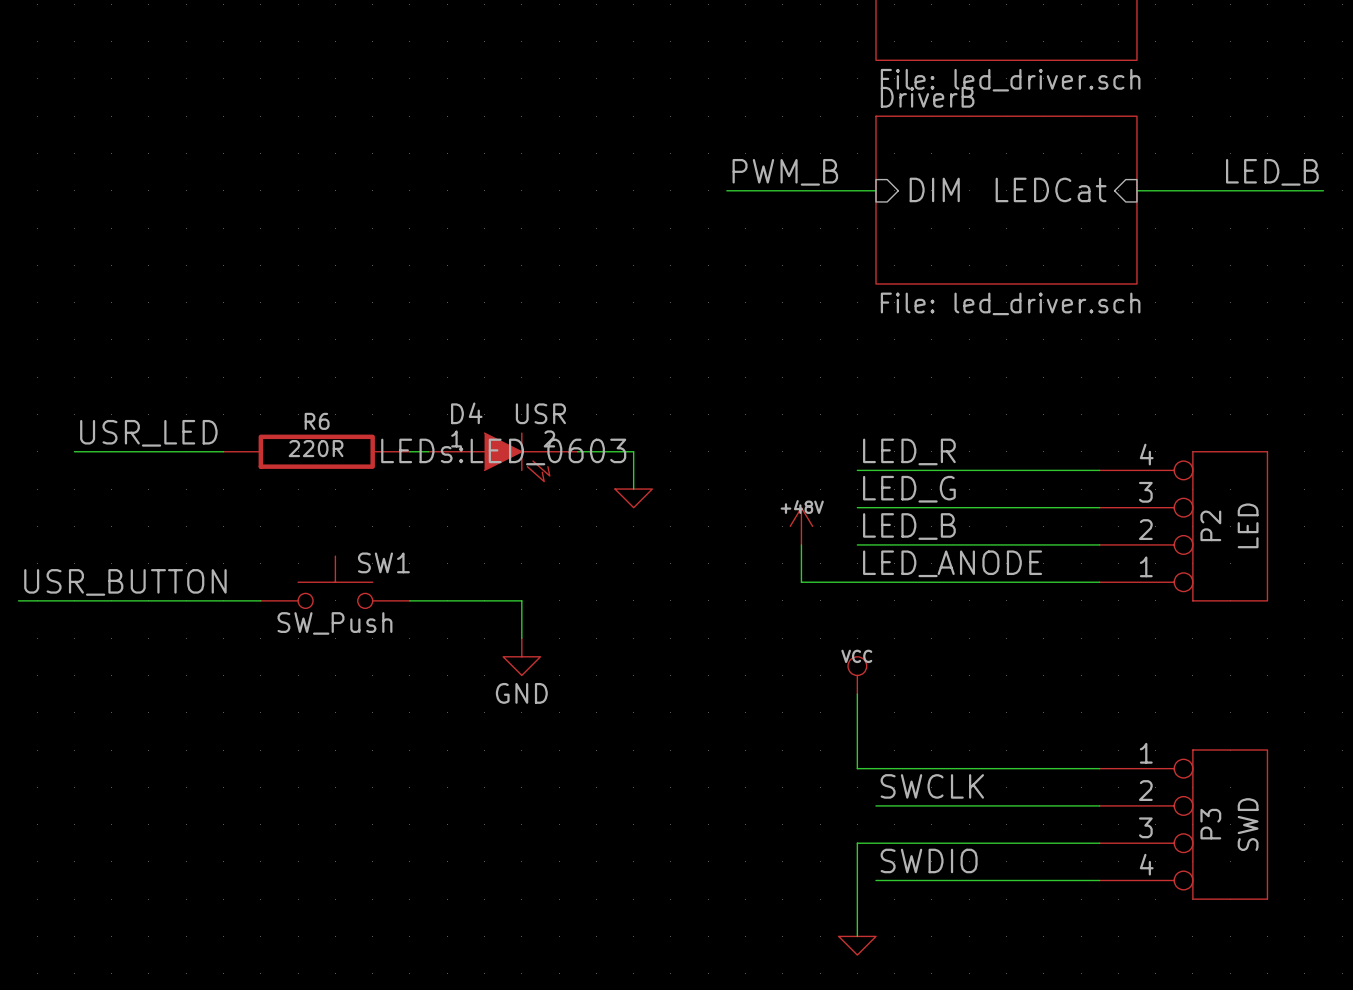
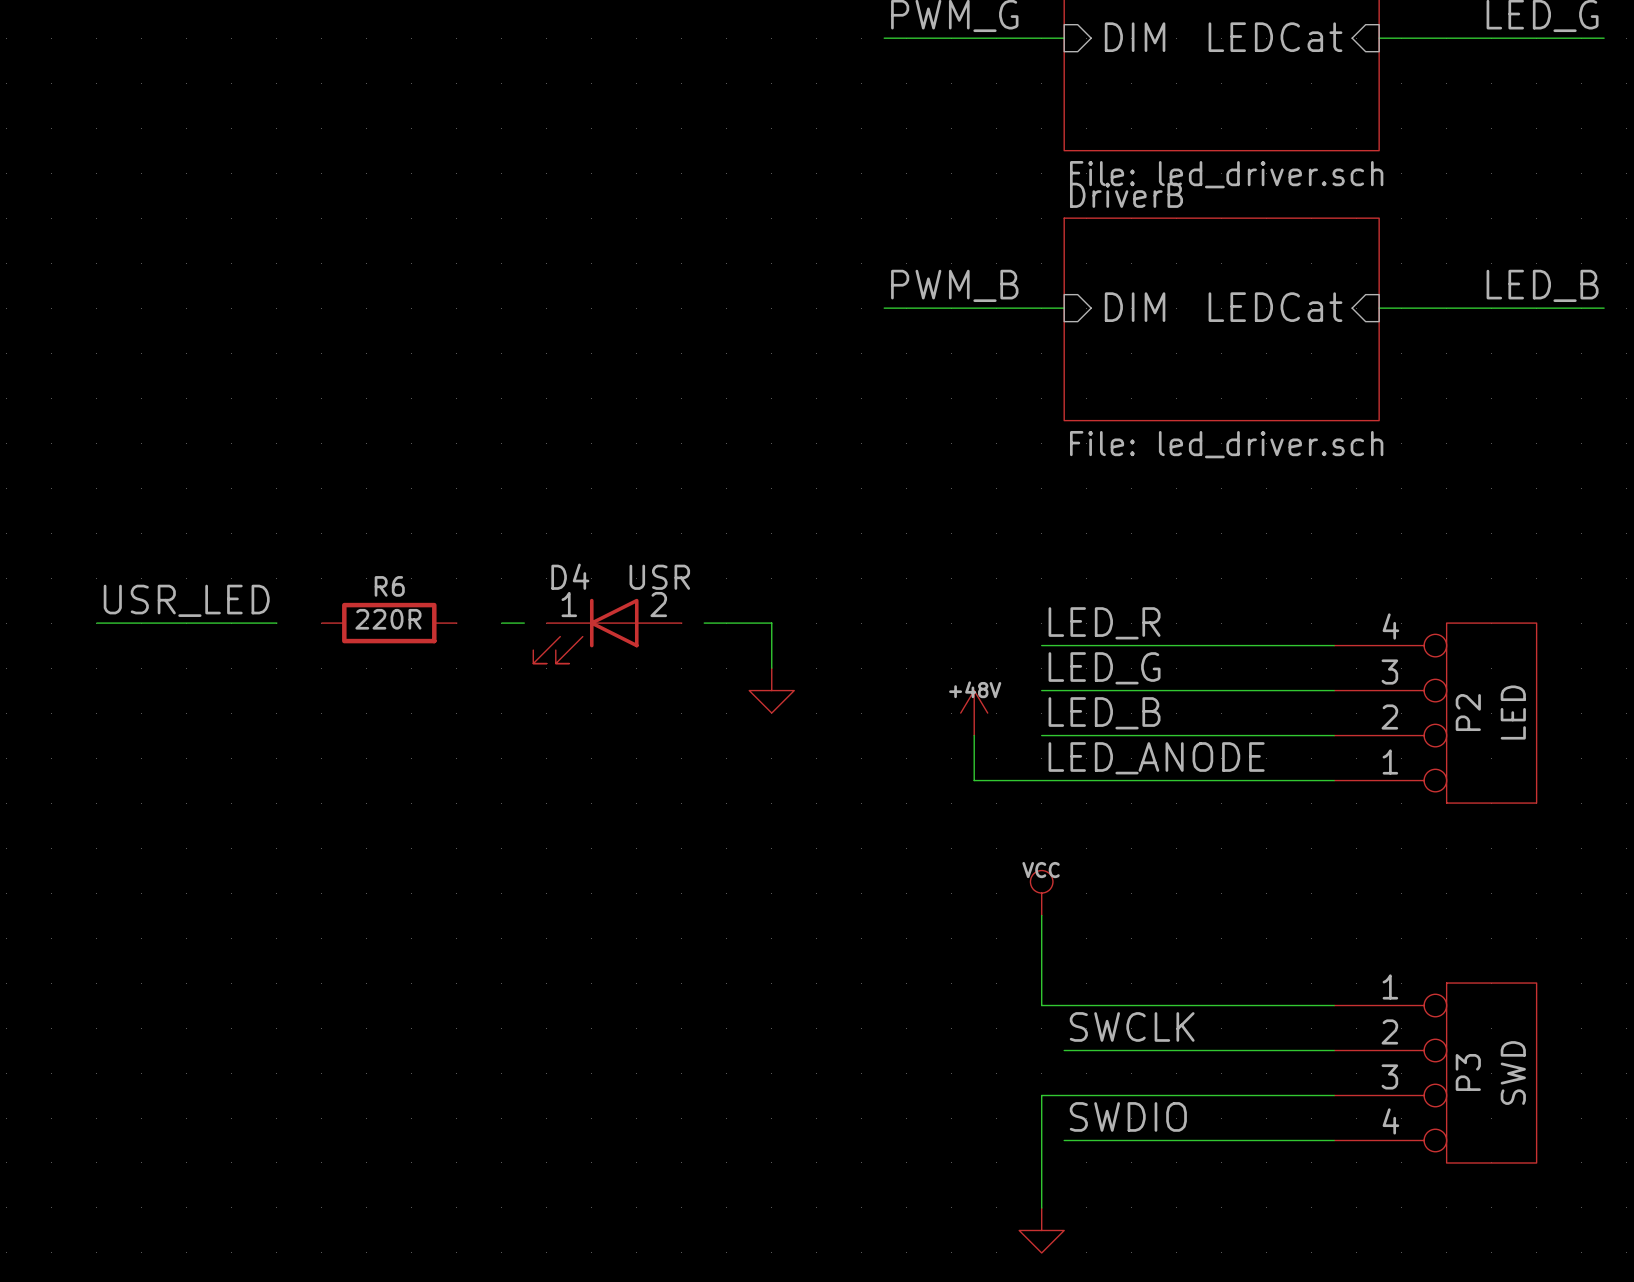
D4 symbol: [428, 433, 578, 482] -> [533, 598, 682, 664]
R6 symbol: [223, 434, 410, 469] -> [321, 602, 457, 644]
D4 text: LEDs:LED_0603 (503, 451) -> none
power symbol shape: [615, 489, 653, 508] -> [749, 668, 795, 714]
label: USR_BUTTON (125, 582) -> none
SW1: SW_Push (335, 582) -> none
wire: (18, 600) (260, 600) -> none
wire: (409, 600) (521, 600) (521, 638) -> none
power symbol: GND (521, 656) -> none
power symbol shape: [838, 936, 876, 956] -> [1019, 1207, 1065, 1253]

